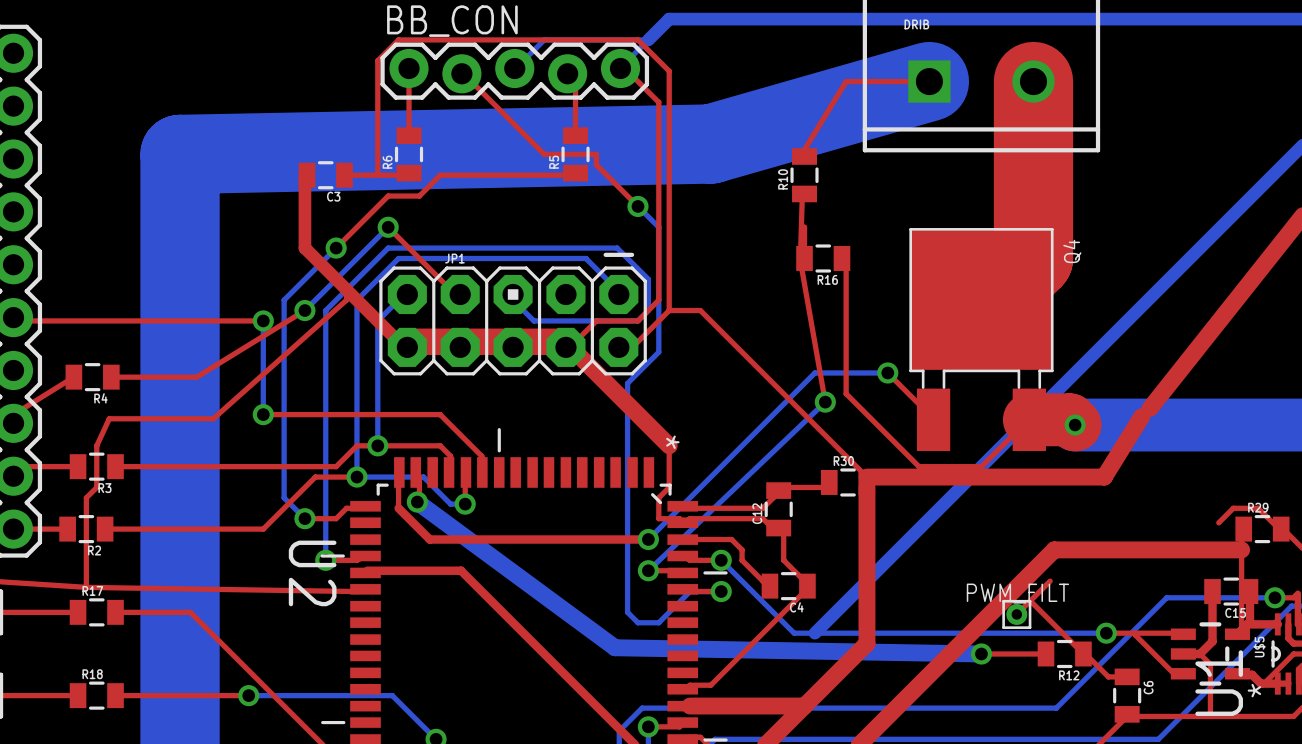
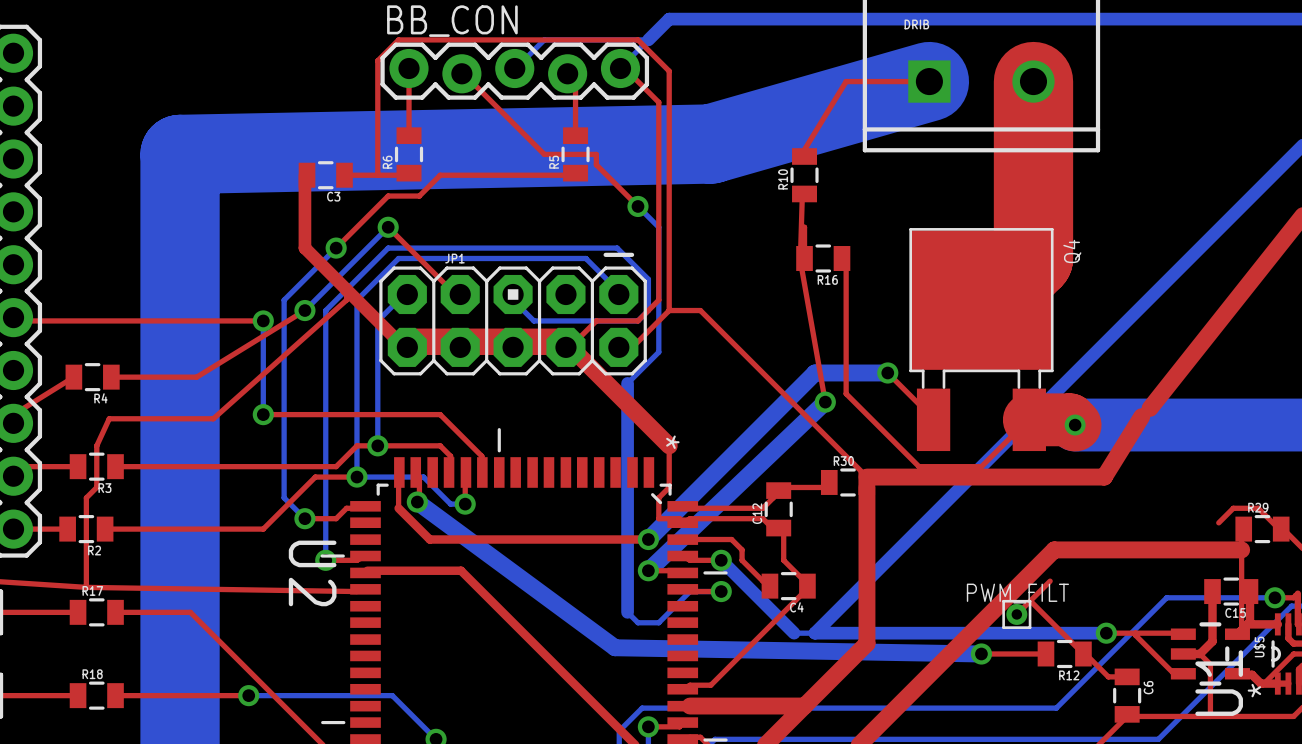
bottom track width: thin (887, 372) (814, 372) (648, 539) -> thick (887, 372) (814, 372) (648, 539)
bottom track width: thin (627, 383) (627, 612) -> thick (627, 383) (627, 612)
bottom track width: thin (825, 402) (648, 570) -> thick (825, 402) (648, 570)
bottom track width: thin (721, 560) (794, 633) -> thick (721, 560) (794, 633)
bottom track width: thin (814, 633) (1106, 633) -> thick (814, 633) (1106, 633)

